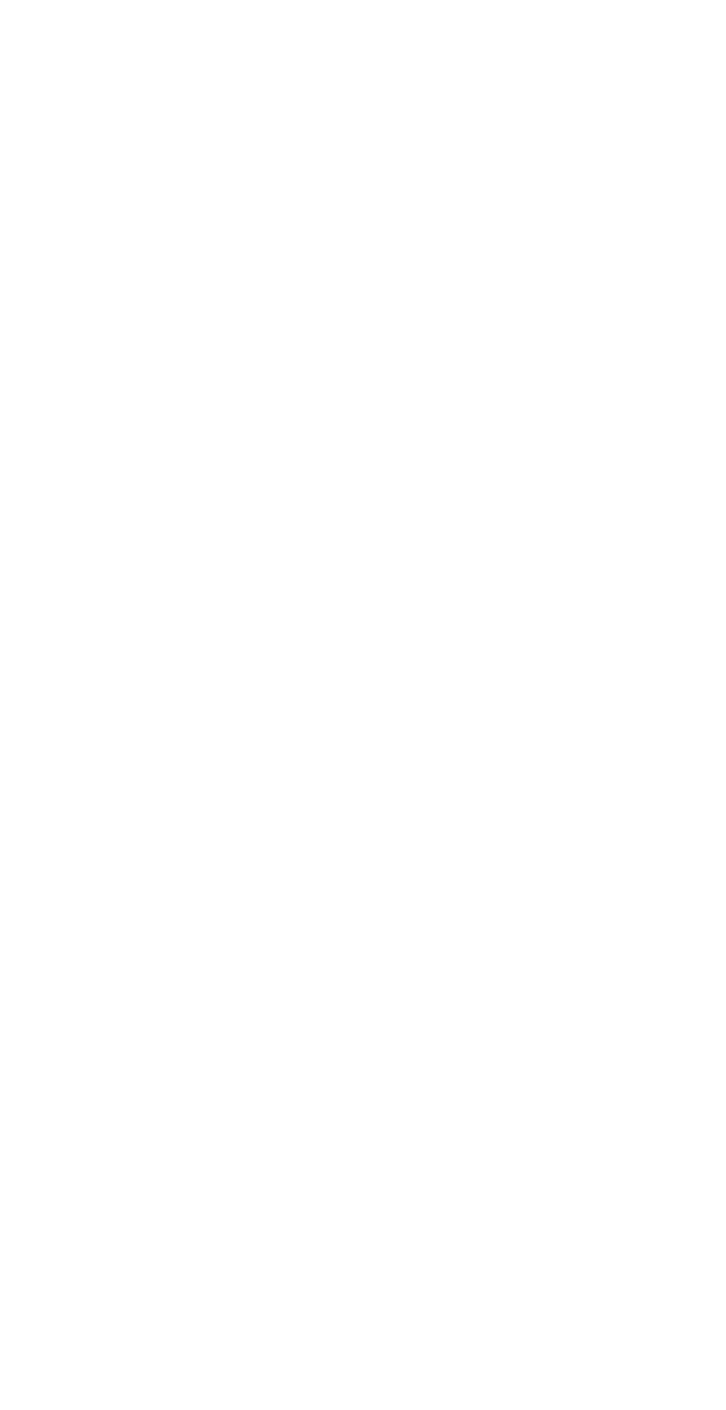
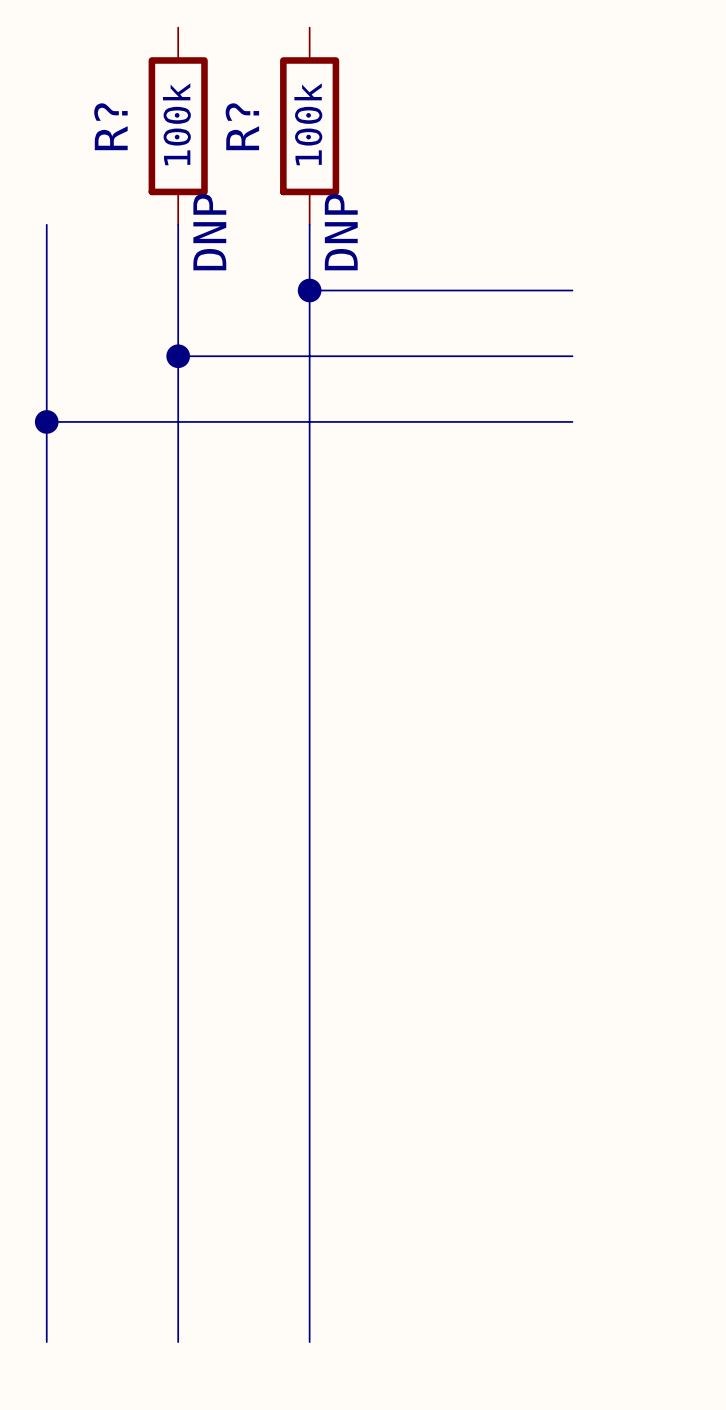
R?: none -> 100k (178, 126)
R?: none -> 100k (309, 126)
wire: none -> (46, 224) (46, 1342)
wire: none -> (178, 224) (178, 1342)
wire: none -> (309, 224) (309, 1342)
wire: none -> (309, 290) (572, 290)
junction: none -> (309, 290)
wire: none -> (178, 356) (572, 356)
junction: none -> (178, 356)
wire: none -> (46, 421) (572, 421)
junction: none -> (46, 421)

